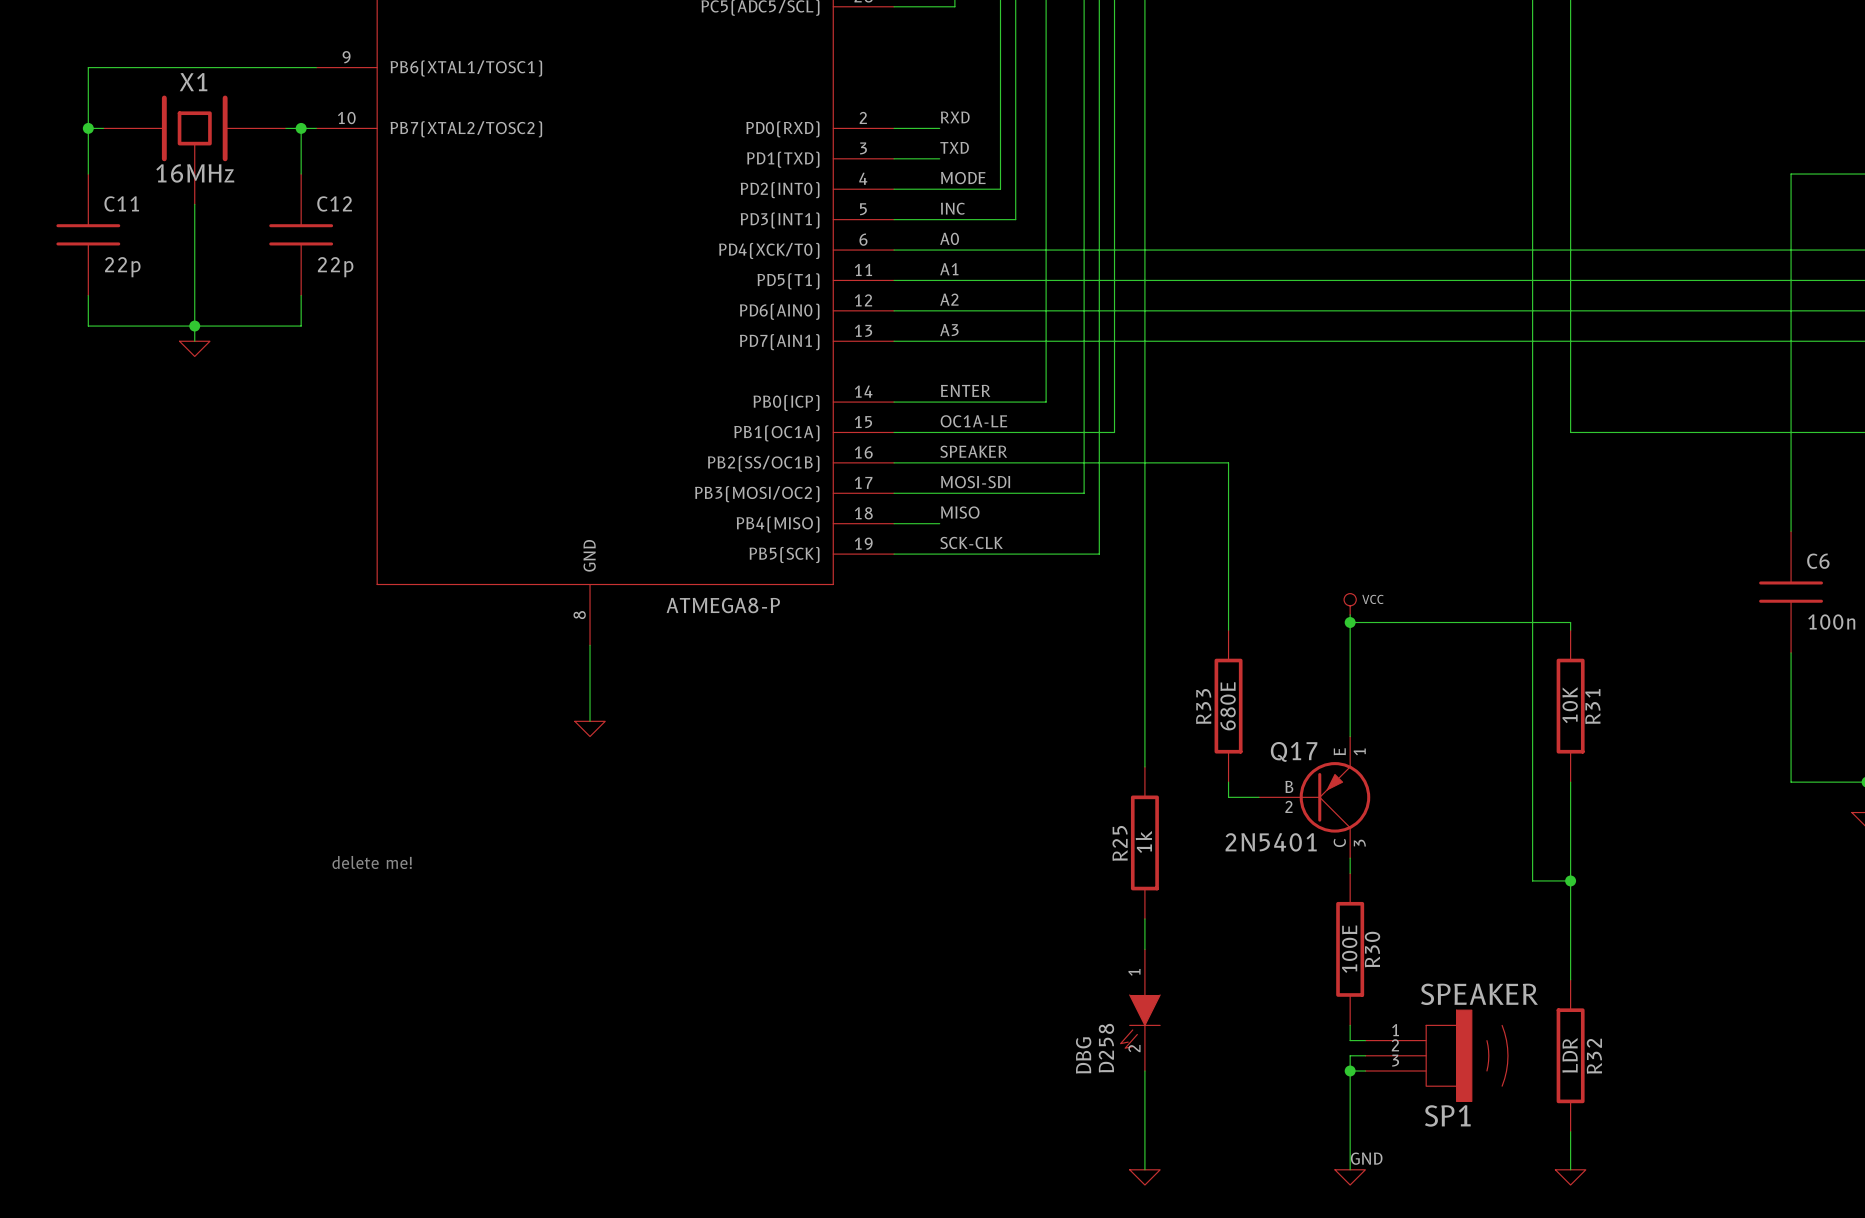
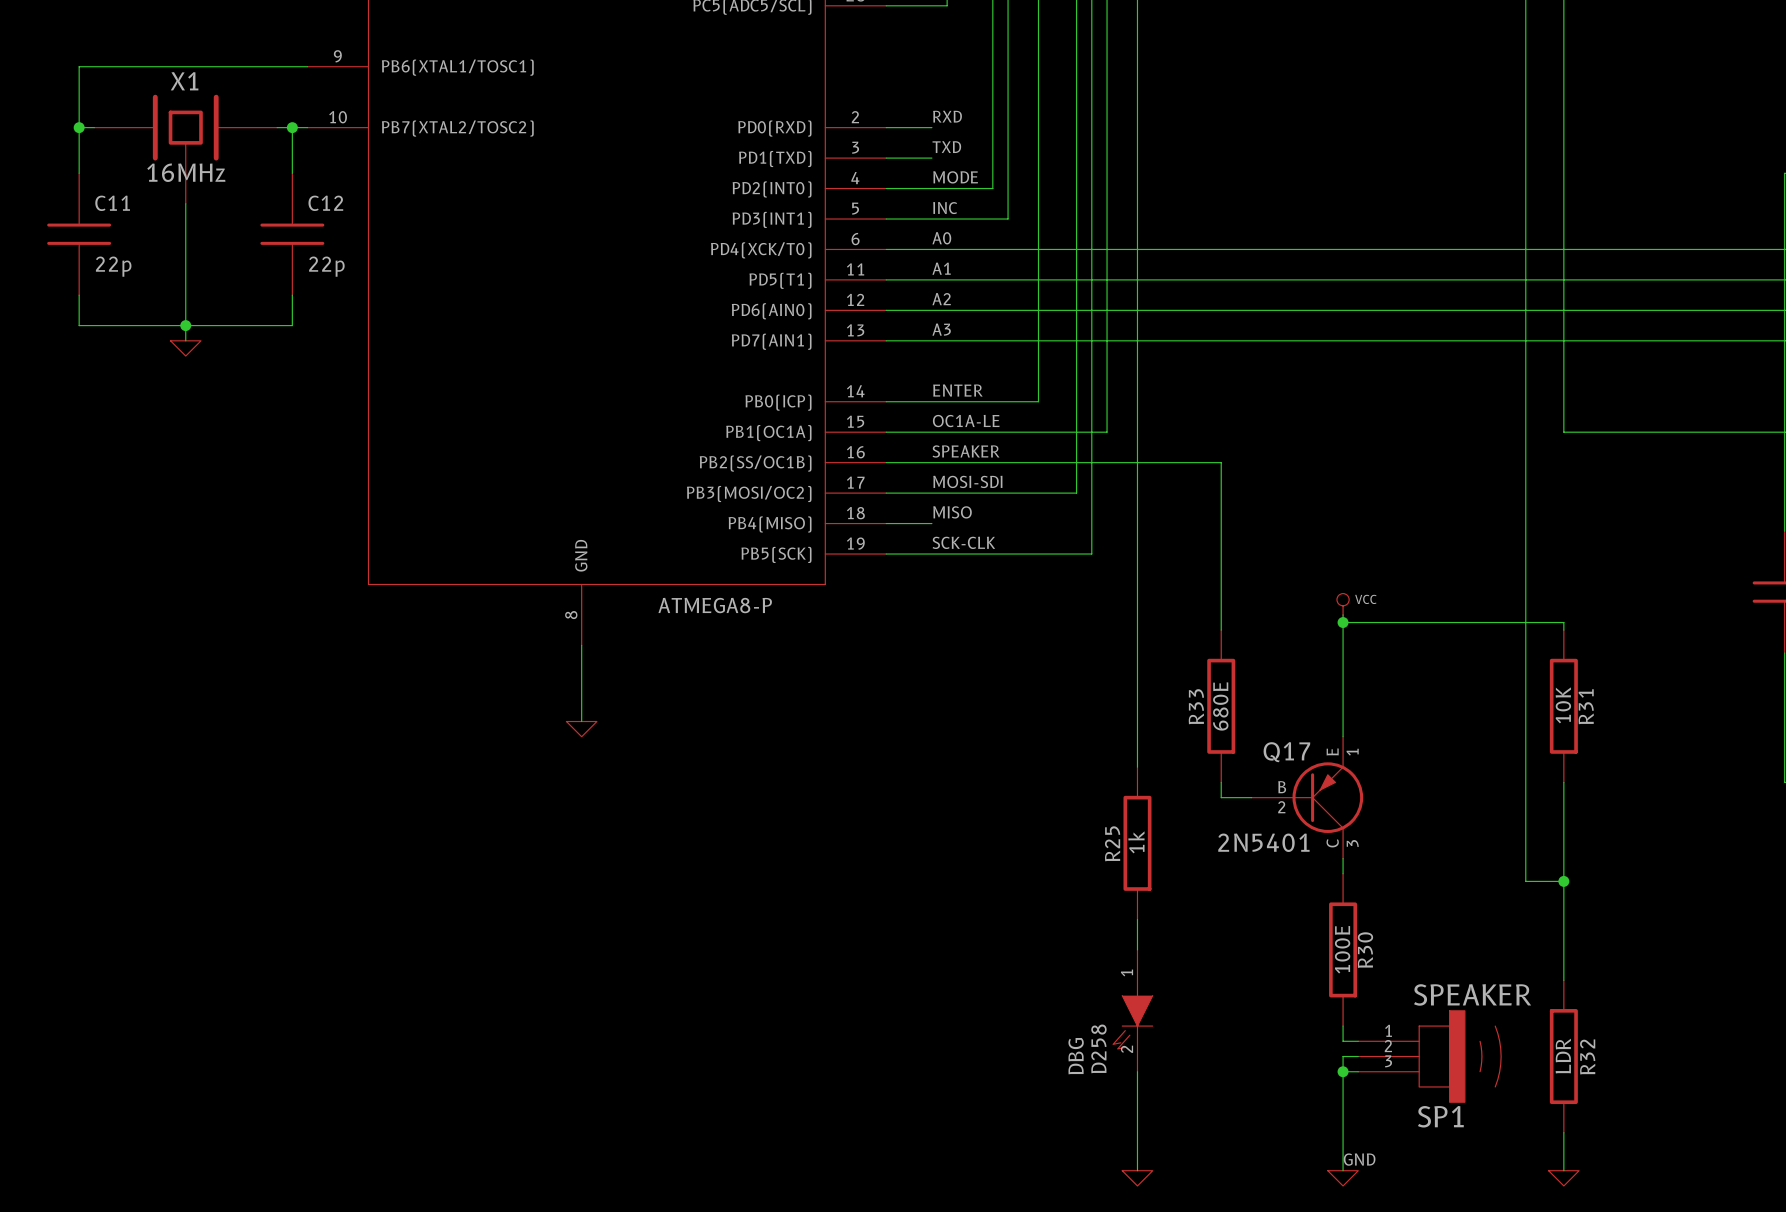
text: delete me! (372, 862) -> none

